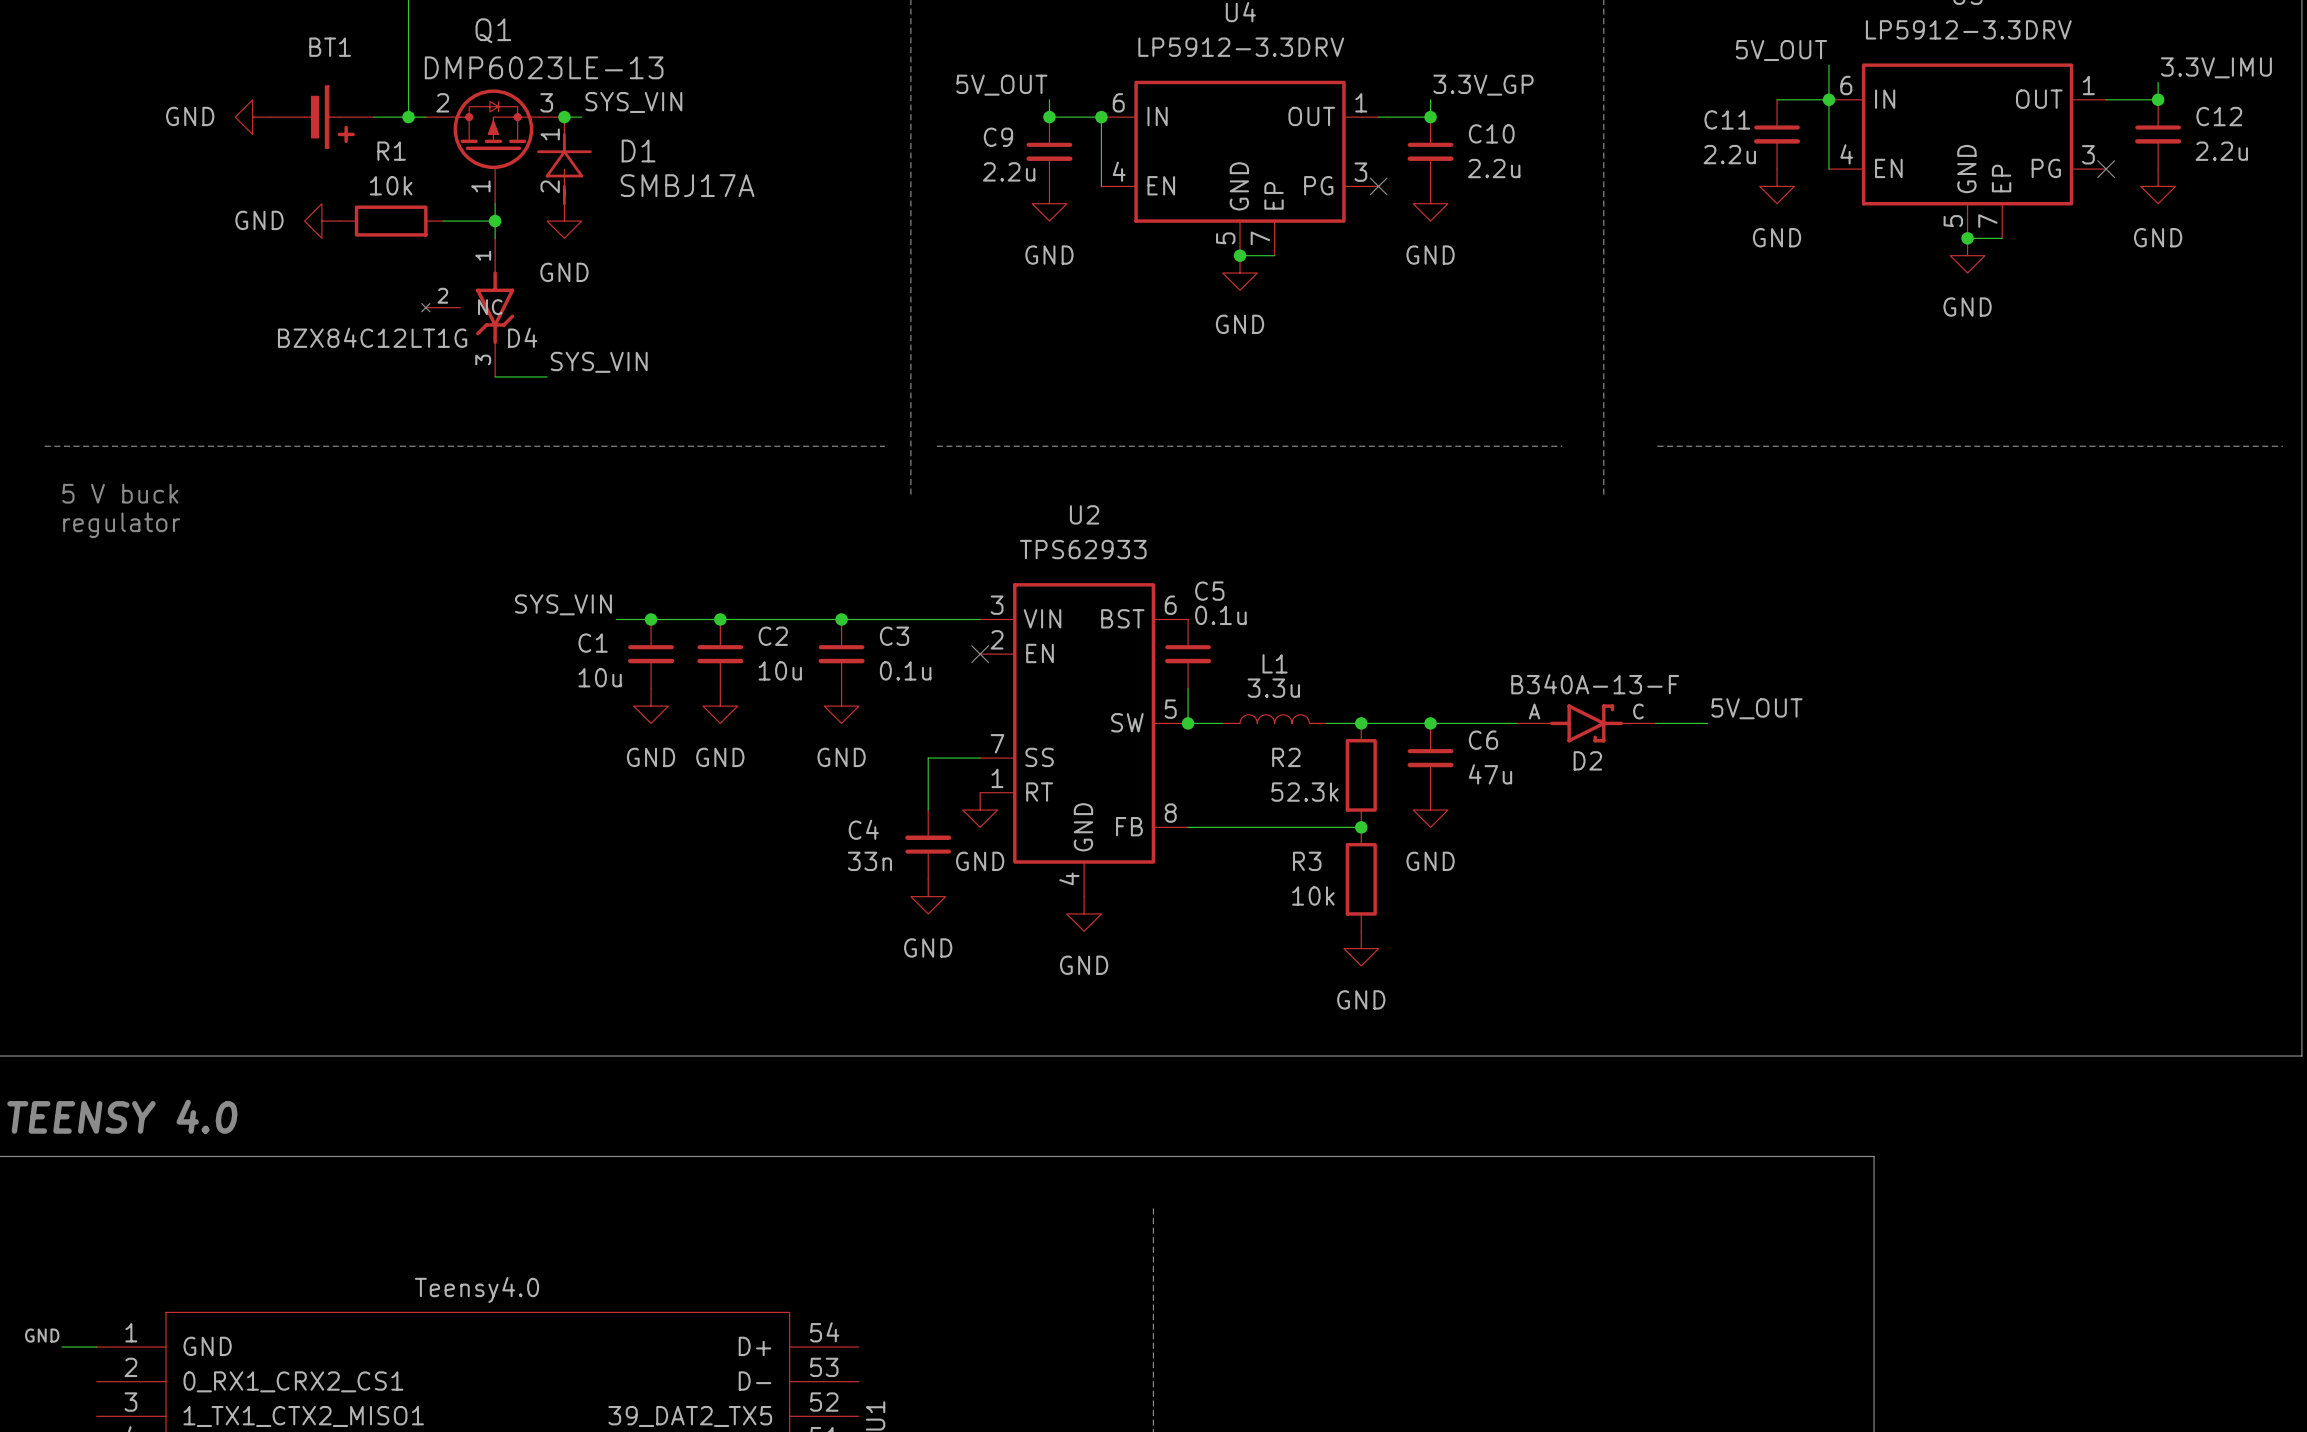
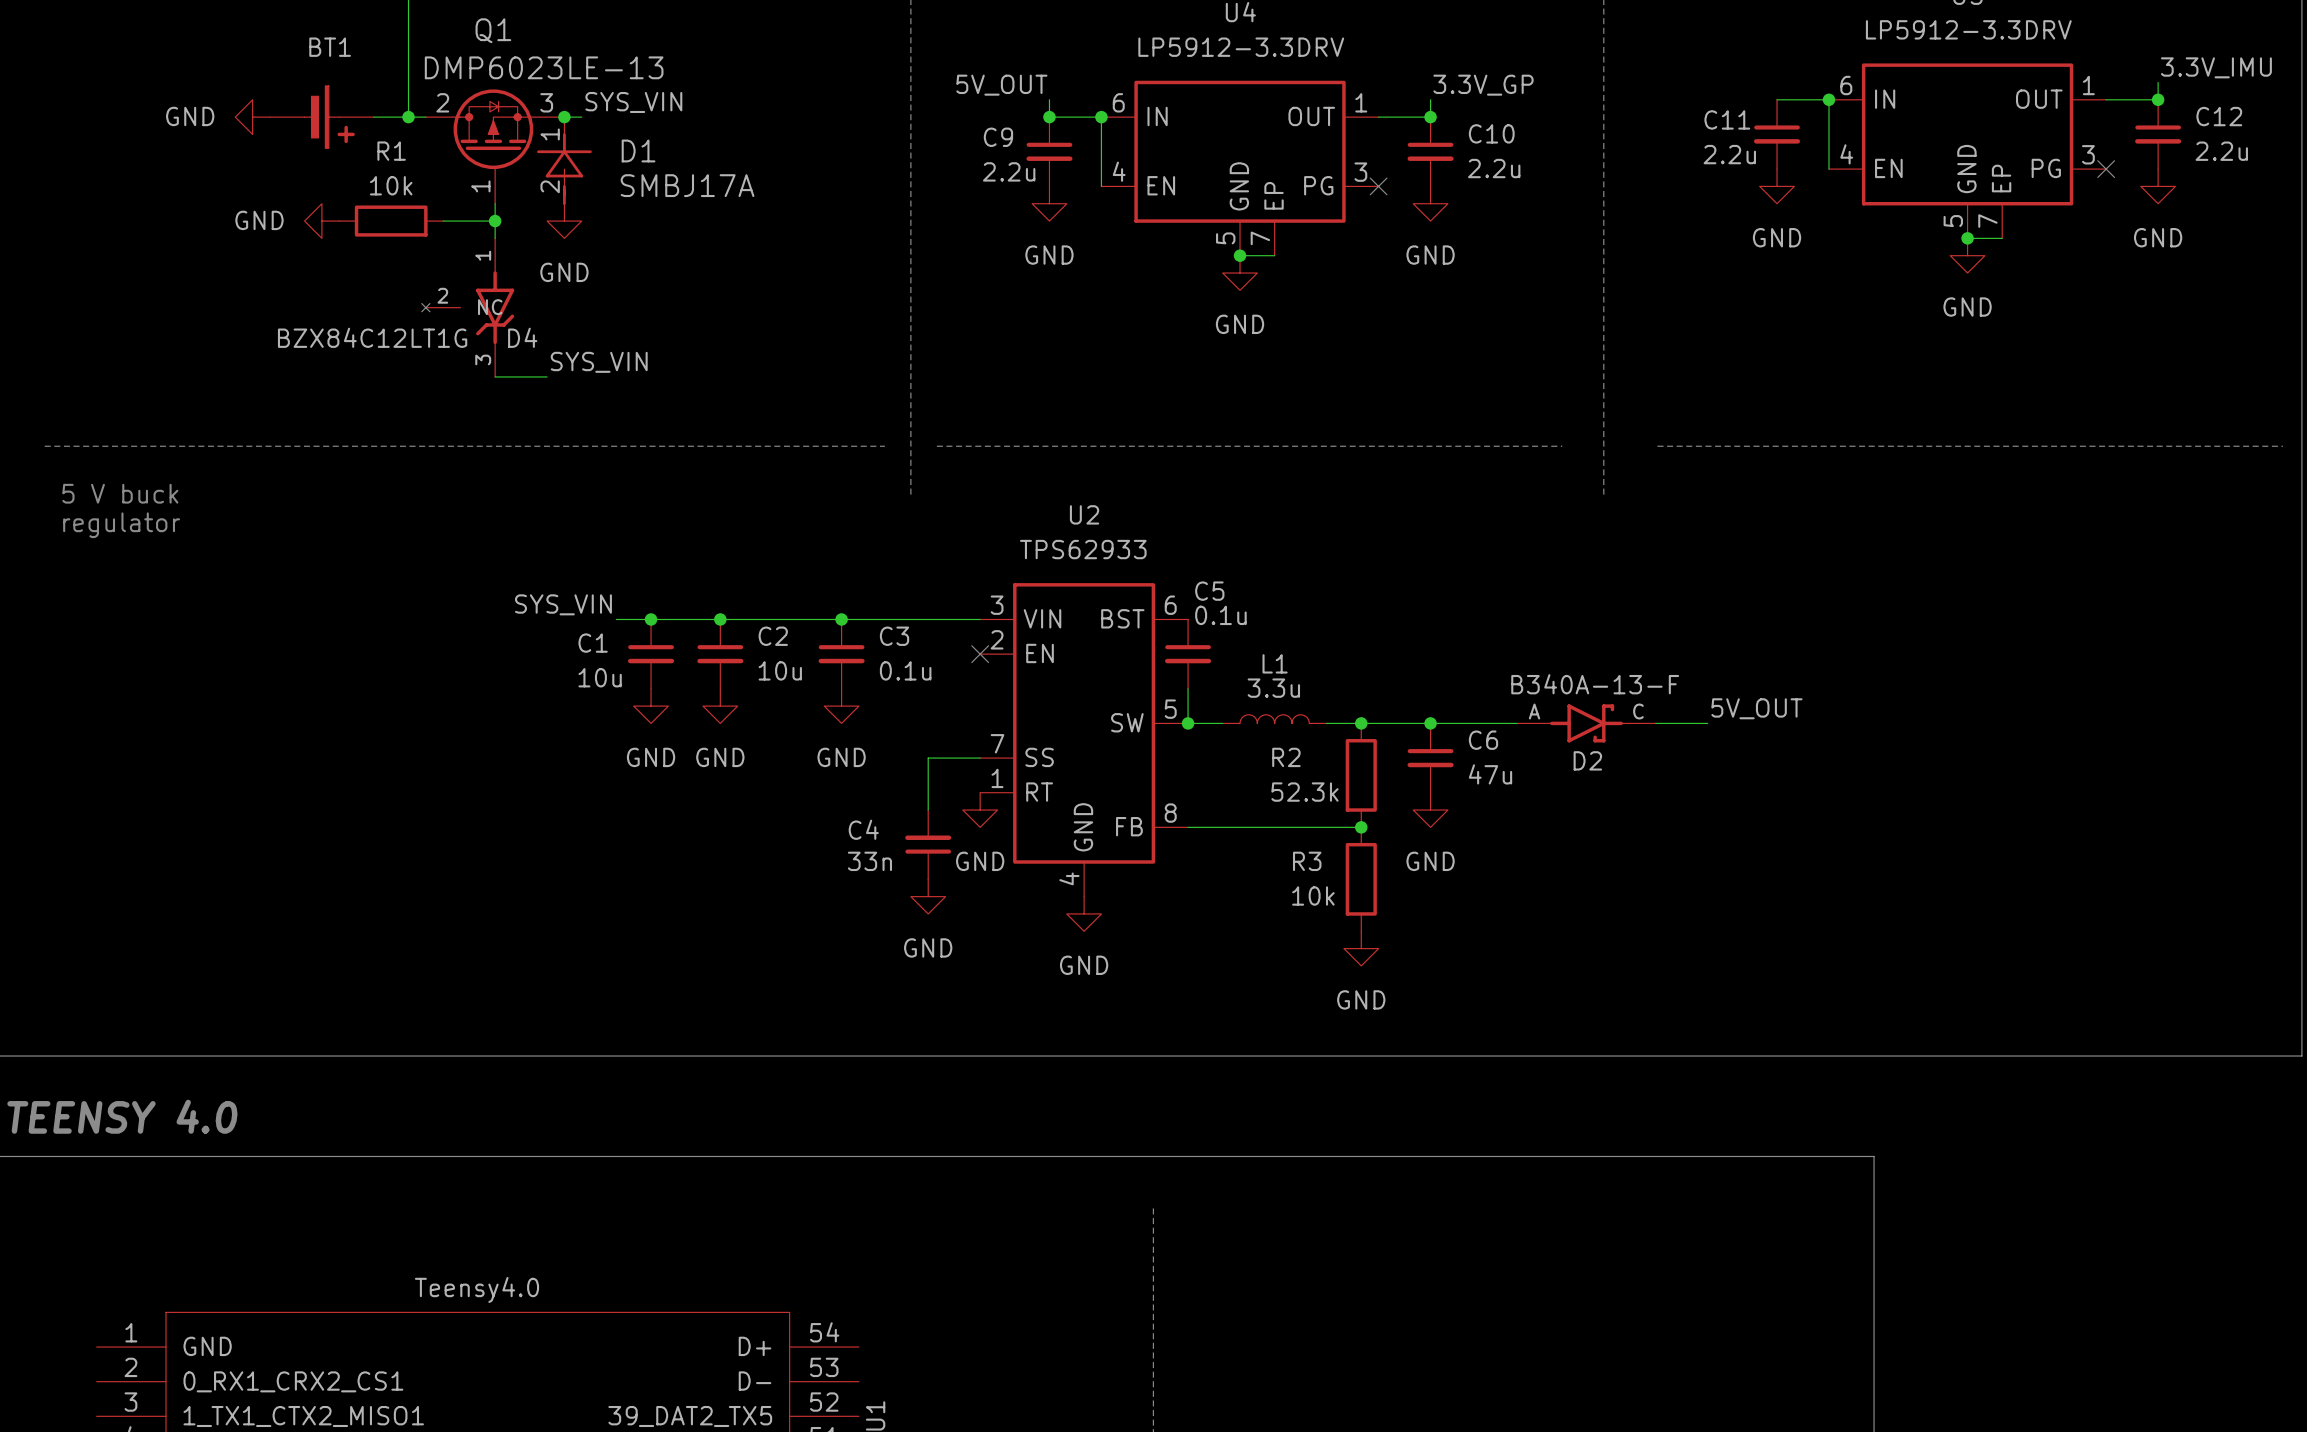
label: 5V_OUT (1781, 50) -> none
wire: (1828, 65) (1828, 99) -> none
label: GND (42, 1335) -> none
wire: (62, 1347) (96, 1347) -> none

